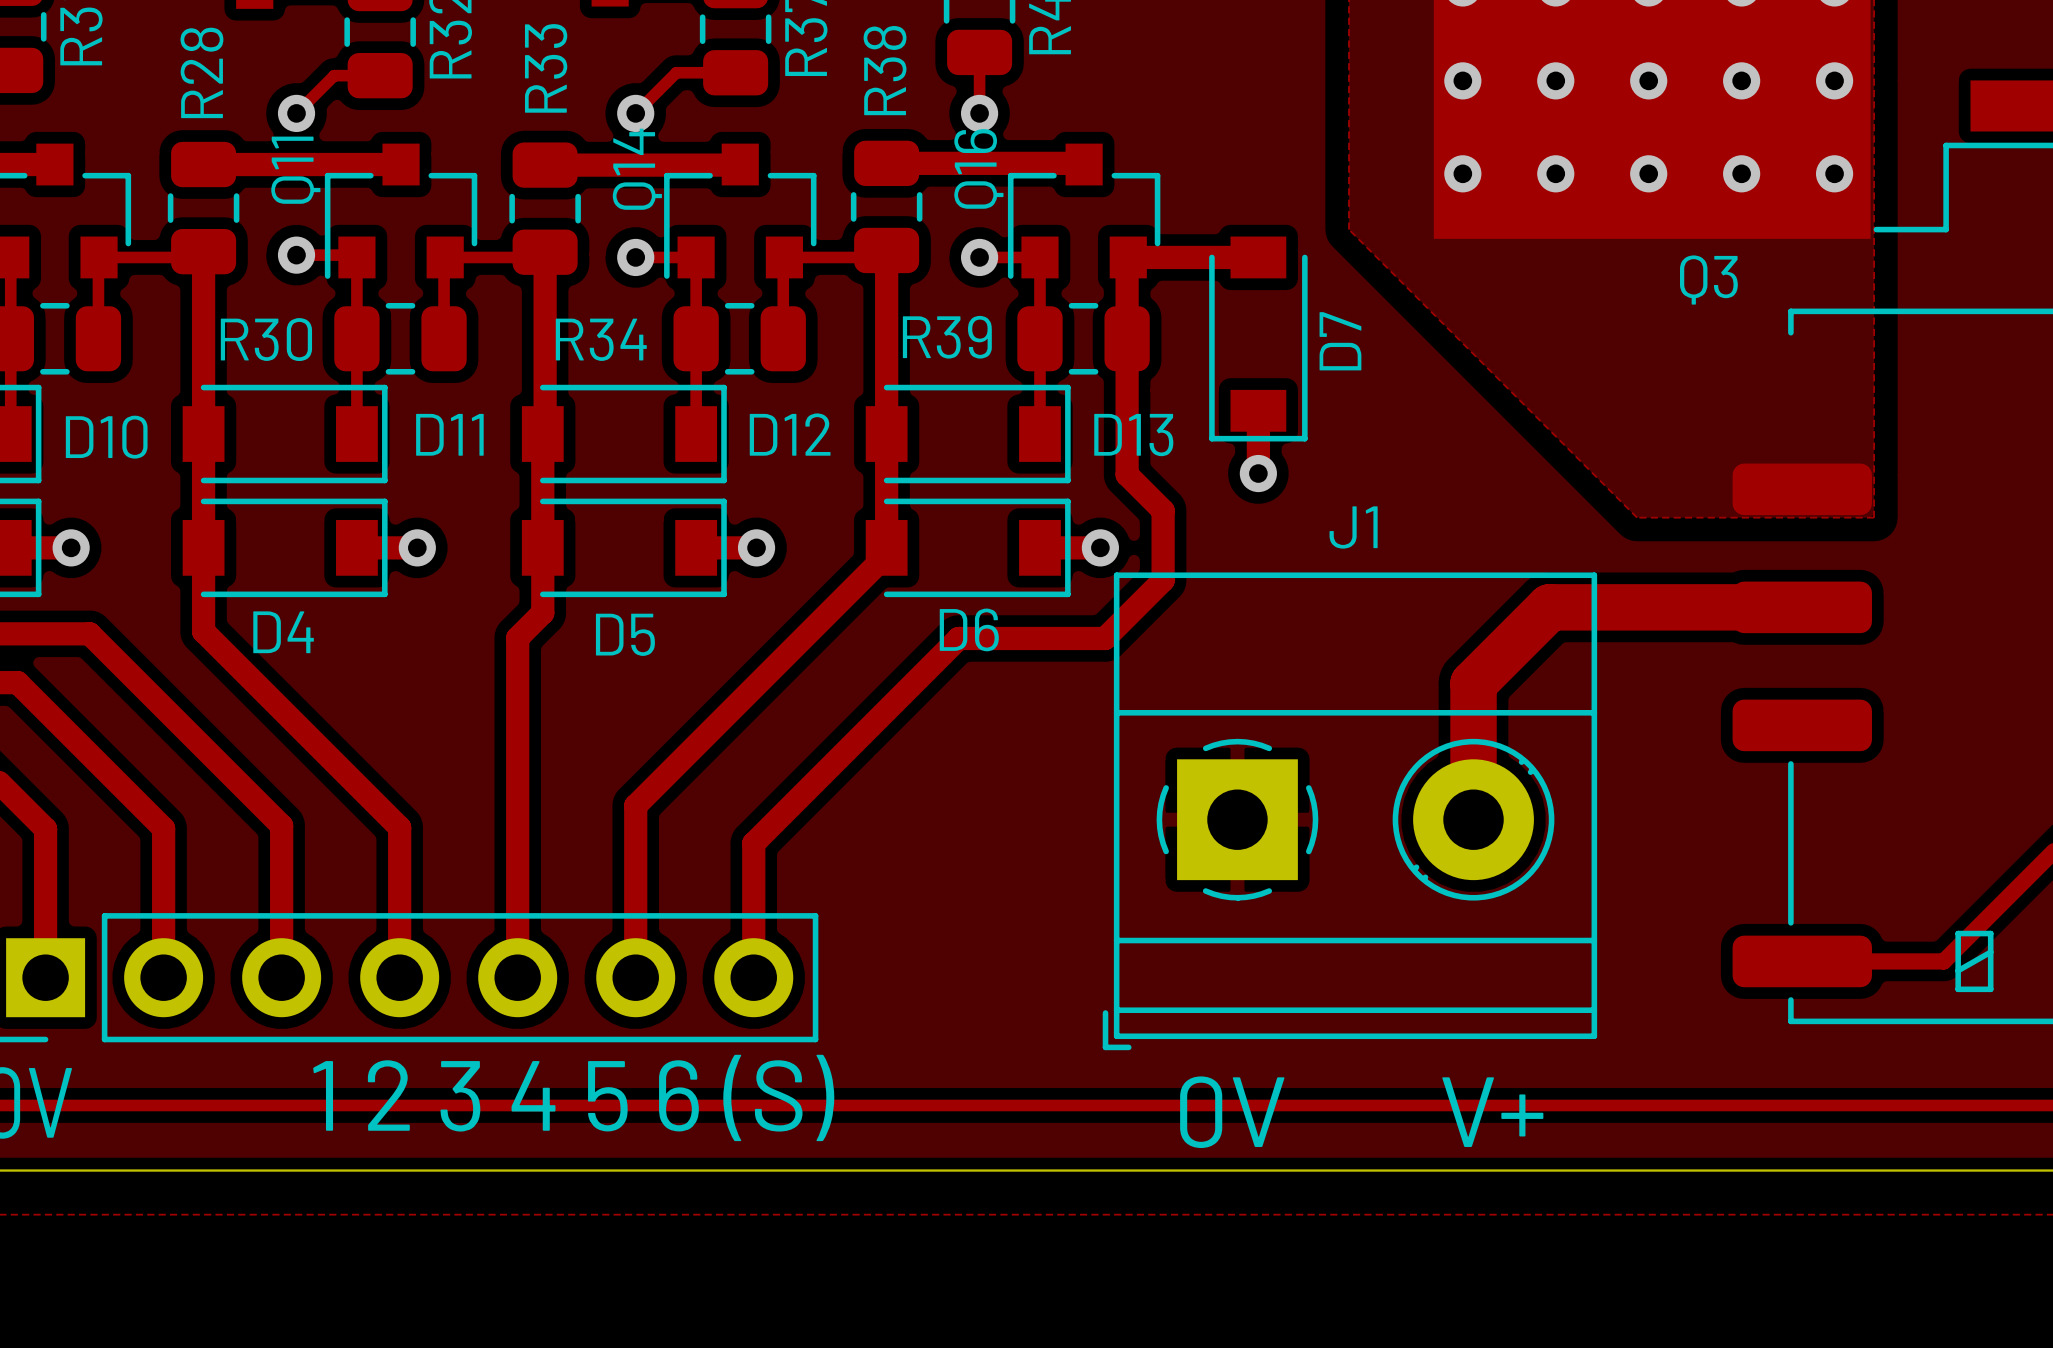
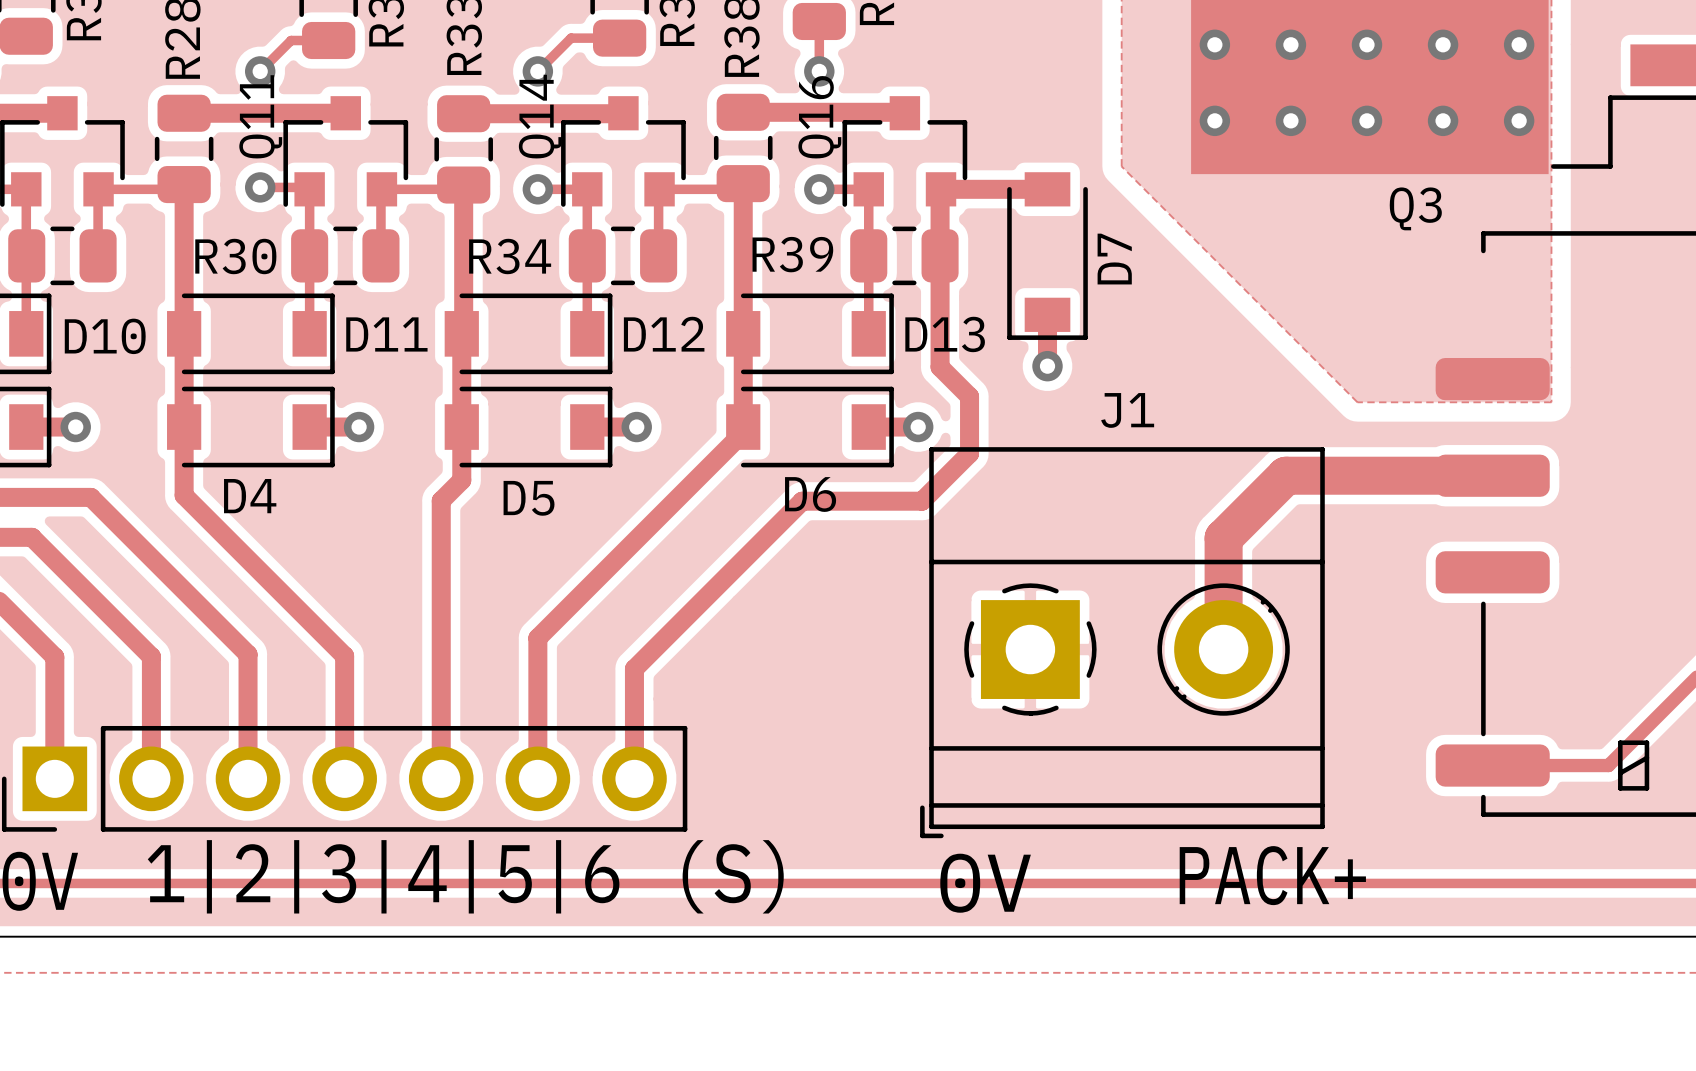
text: 1 2 3 4 5 6 (S) (573, 1097) -> 1|2|3|4|5|6 (S) (465, 876)
text position: 0V (1232, 1112) -> 0V (985, 883)
text: V+ (1492, 1112) -> PACK+ (1272, 875)

